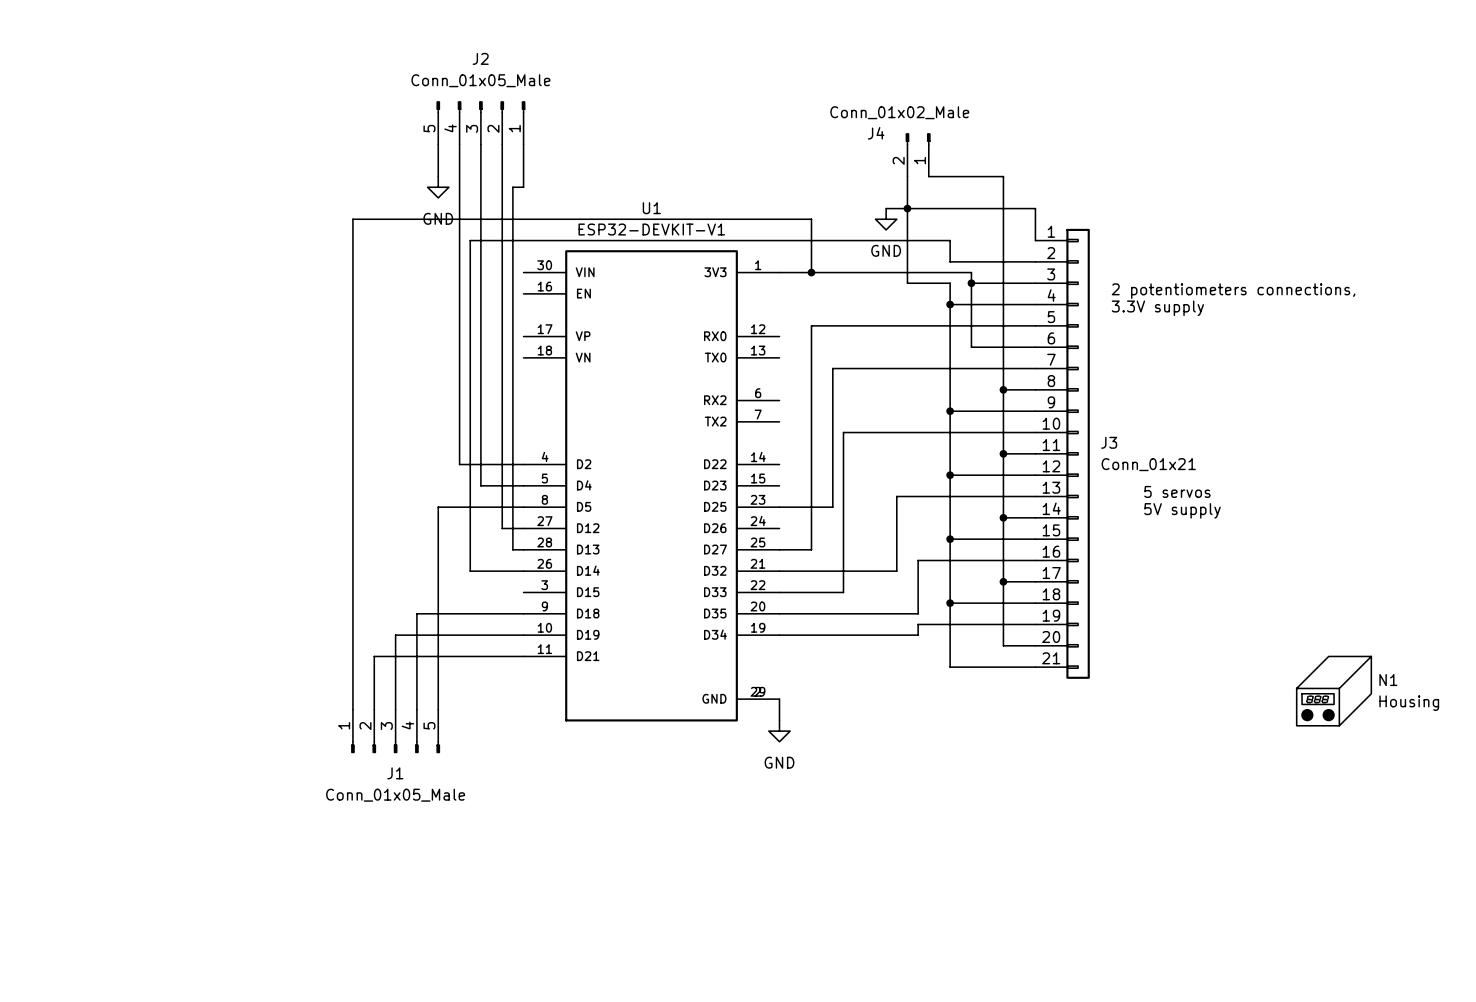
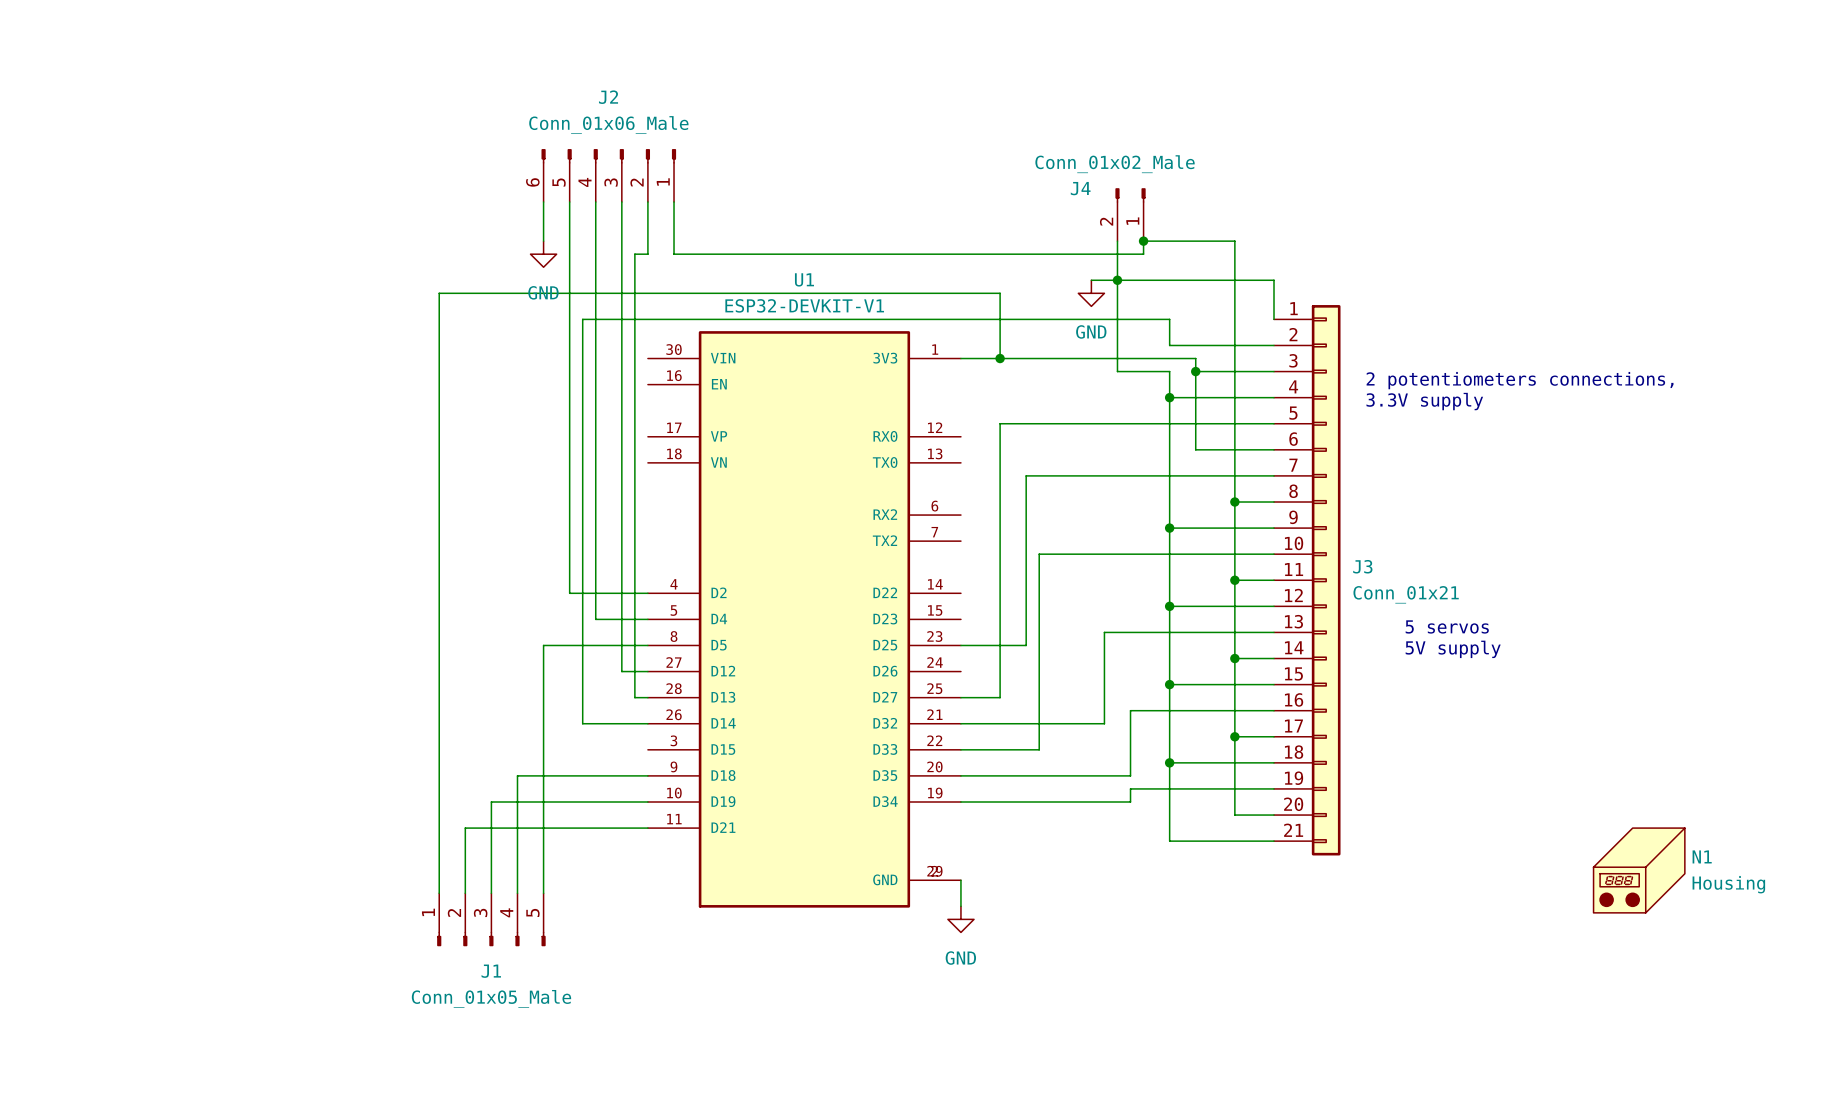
J2 value: Conn_01x05_Male (480, 80) -> Conn_01x06_Male (608, 125)
J2 symbol: [436, 101, 526, 145] -> [541, 149, 677, 203]
wire: none -> (674, 202) (674, 254) (1143, 254) (1143, 241)
junction: none -> (1143, 241)

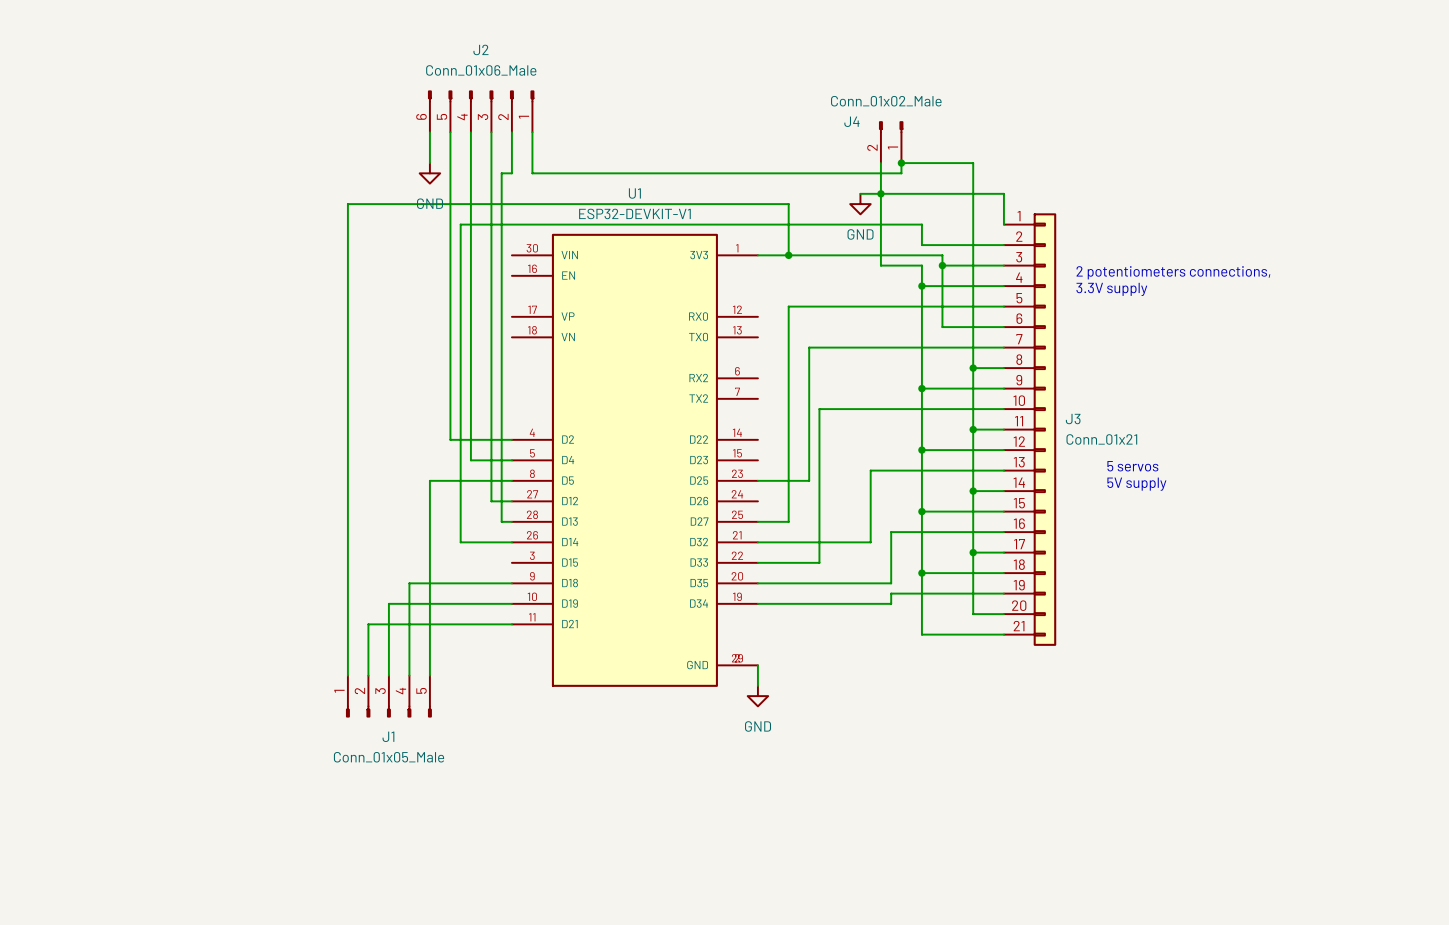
N1: Housing (1639, 870) -> none

